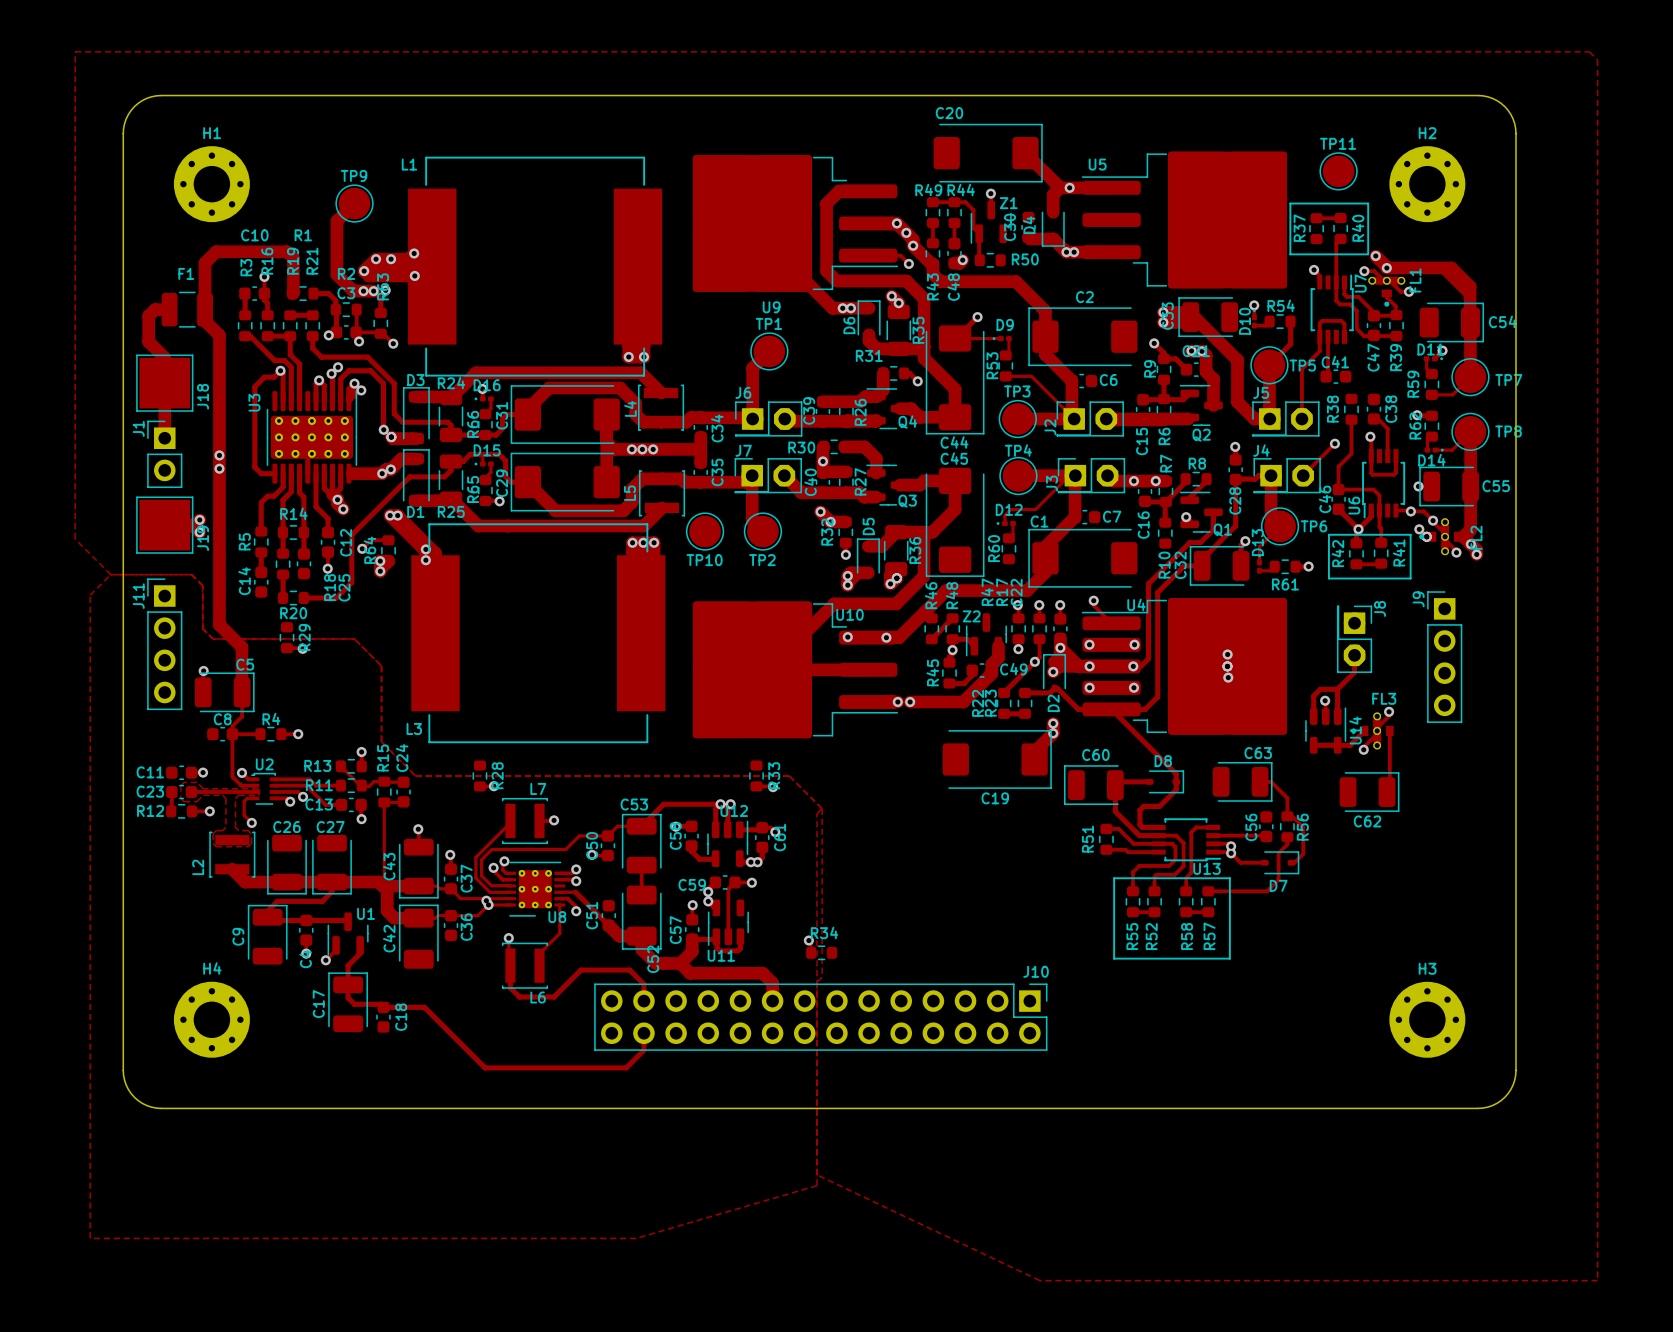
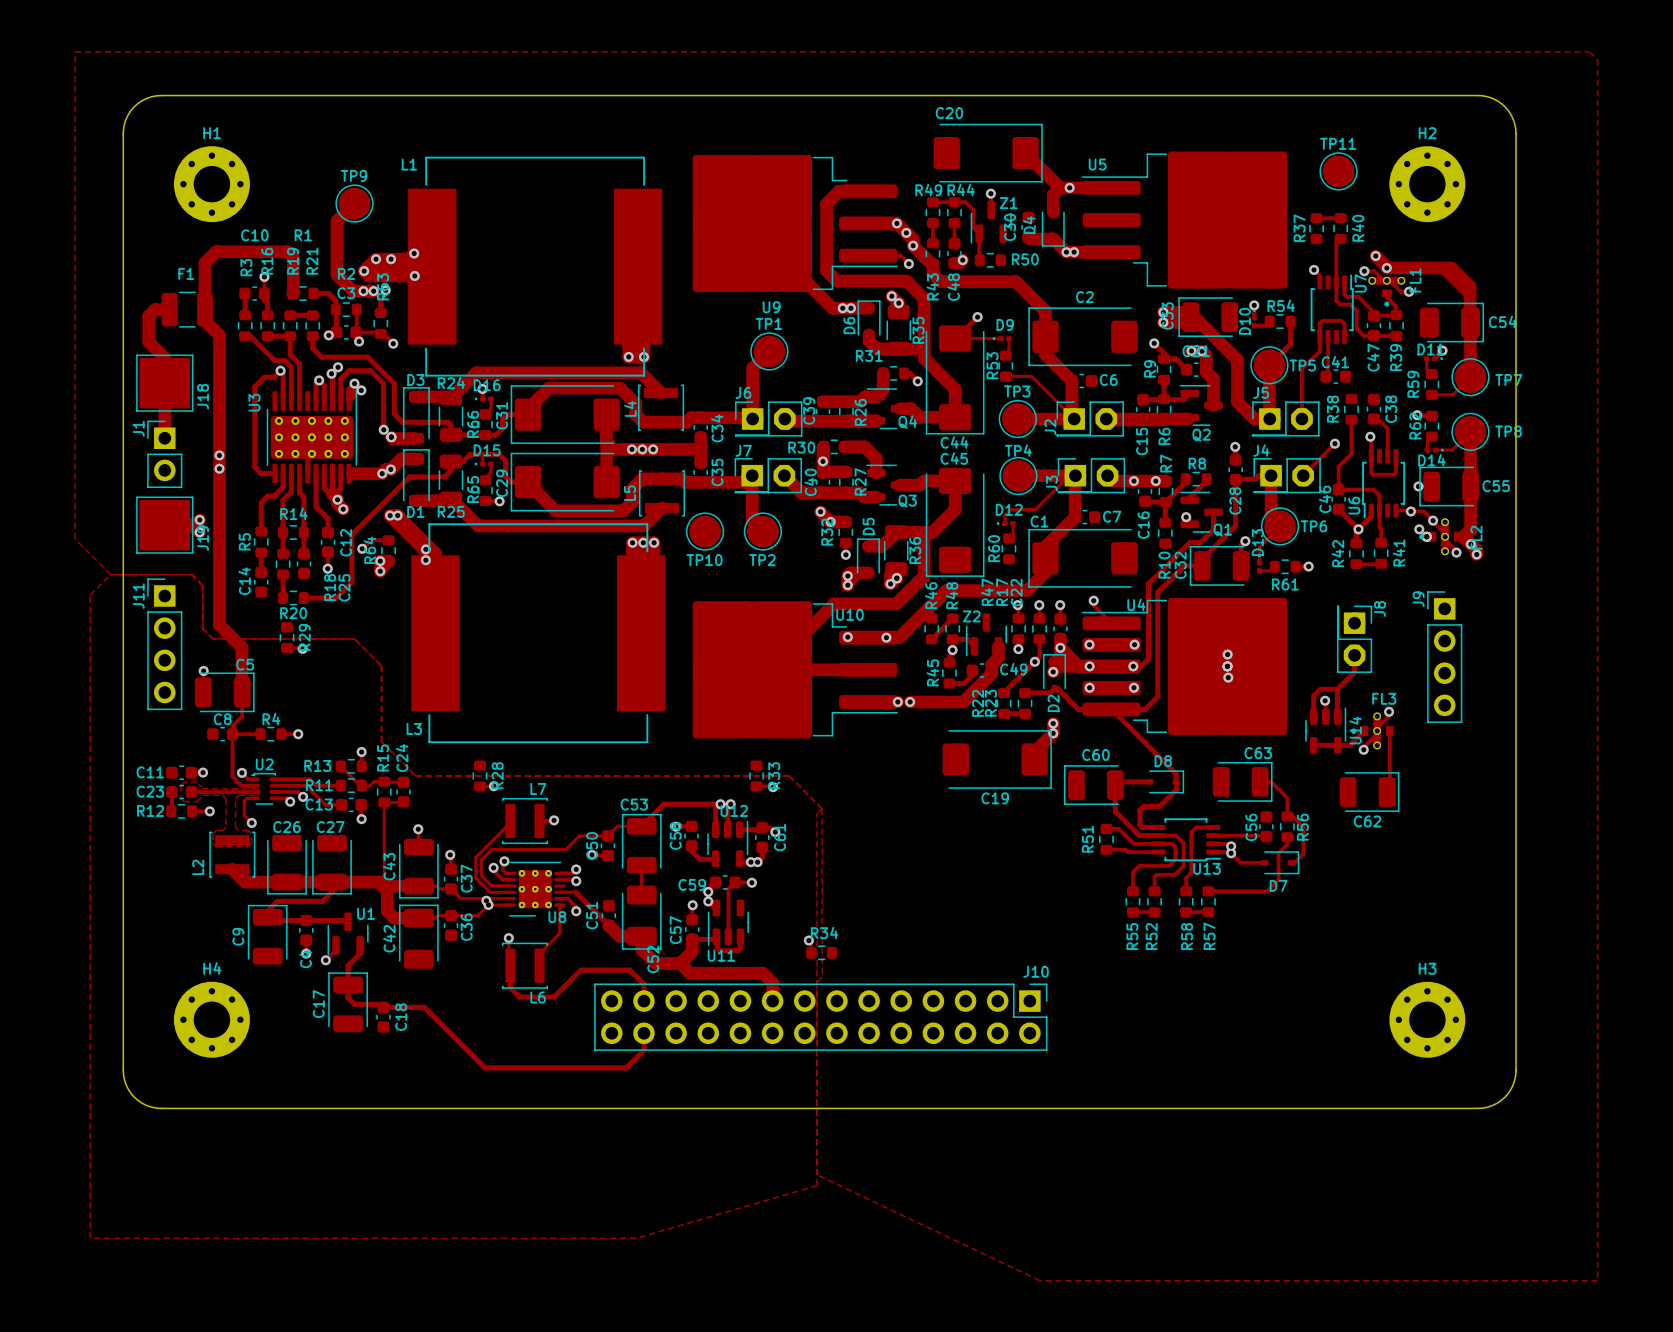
line: (1290, 203) (1368, 203) (1368, 254) (1290, 254) (1290, 203) -> none
line: (1328, 534) (1410, 534) (1410, 578) (1328, 578) (1328, 534) -> none
line: (1114, 878) (1229, 878) (1229, 958) (1114, 958) (1114, 878) -> none

